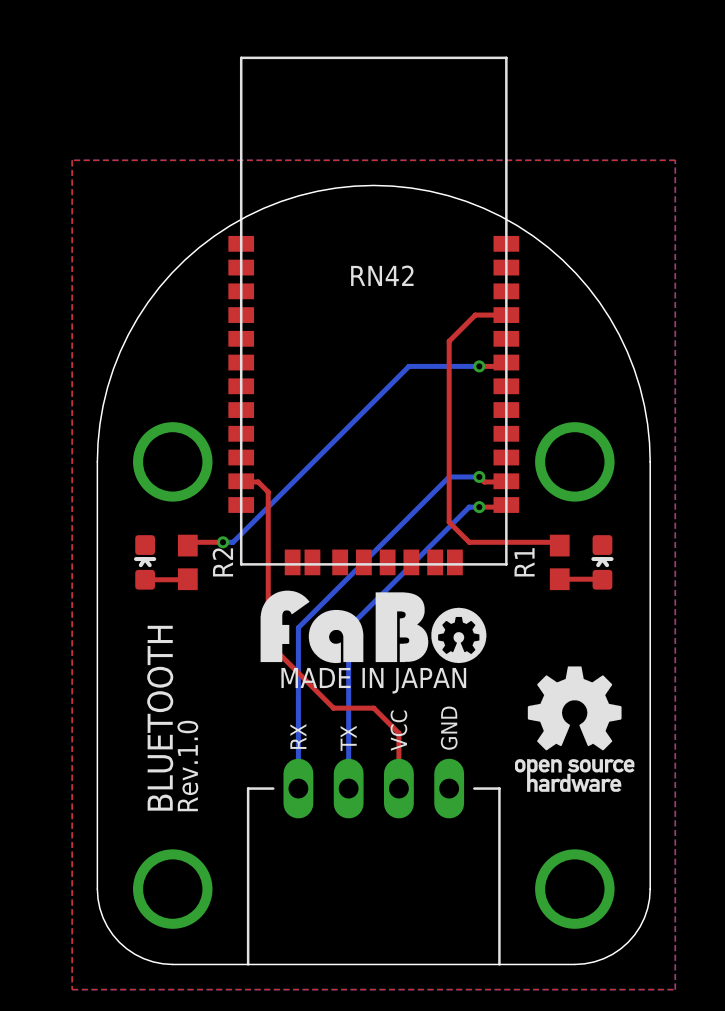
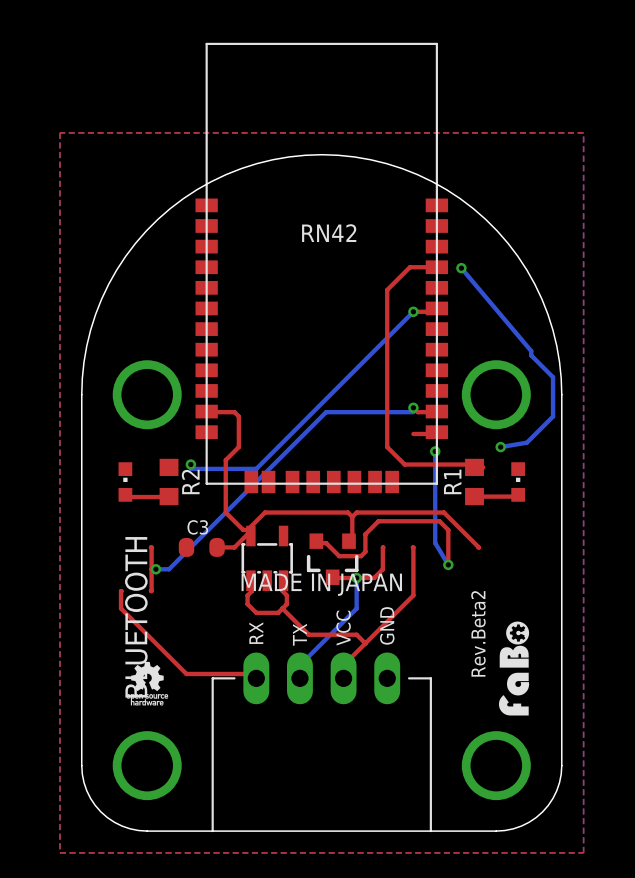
bottom track: none -> (461, 268) (531, 351) (531, 355) (553, 377) (553, 416) (526, 442) (500, 447)
via: none -> (461, 268)
bottom track: (479, 366) (408, 366) (233, 542) (223, 542) -> (413, 311) (256, 468) (190, 468)
bottom track: (479, 476) (449, 476) (298, 627) (298, 788) -> none
top track: (258, 481) (268, 492) (268, 642) (333, 708) (373, 708) (398, 733) (398, 773) -> (221, 412) (234, 412) (238, 416) (238, 447) (225, 460) (225, 512) (243, 529) (251, 529) (250, 536)
bottom track: none -> (413, 412) (326, 412) (169, 569) (155, 569)
bottom track: (479, 507) (469, 507) (348, 627) (348, 773) -> (356, 577) (356, 608) (299, 665)
via position: (479, 507) -> (435, 451)
via: none -> (500, 447)
bottom track: none -> (435, 451) (435, 543) (448, 564)
R2 footprint: [177, 534, 198, 591] -> [159, 458, 179, 506]
R1 footprint: [549, 534, 570, 591] -> [465, 458, 484, 506]
part footprint: [134, 535, 157, 590] -> [118, 462, 133, 502]
part footprint: [591, 535, 614, 590] -> [511, 462, 526, 502]
top track: (223, 542) (194, 542) (187, 545) -> none
drawing: [260, 590, 487, 664] -> none
top track: none -> (352, 516) (352, 538) (349, 541)
top track: none -> (352, 516) (356, 512) (443, 512) (478, 547)
top track: none -> (352, 516) (347, 512) (265, 512) (247, 529) (250, 536)
top track: none -> (250, 536) (247, 534) (234, 547) (217, 547)
top track: none -> (316, 541) (317, 543) (326, 543) (339, 556) (361, 556) (365, 551) (365, 534) (378, 521) (439, 521) (448, 529) (448, 564)
top track: none -> (150, 547) (150, 591)
C3: none -> (201, 547)
top track: none -> (383, 547) (382, 569) (374, 577) (332, 577)
top track: none -> (412, 547) (413, 595) (343, 665)
part: none -> (267, 558)
part: none -> (332, 559)
via: none -> (448, 564)
via: none -> (155, 569)
drawing: [515, 666, 635, 792] -> none
via: none -> (356, 577)
top track: none -> (250, 580) (251, 591) (247, 595) (247, 604) (256, 612) (278, 612) (286, 604) (286, 595) (282, 591) (283, 580)
top track: none -> (121, 591) (121, 608) (186, 674) (251, 674) (256, 678)
top track: none -> (282, 608) (308, 634) (356, 634) (365, 643)
drawing: none -> [498, 621, 530, 716]
text: none -> Rev.Beta2 (478, 633)
text: Rev.1.0 (187, 766) -> none
drawing: none -> [126, 661, 169, 706]

